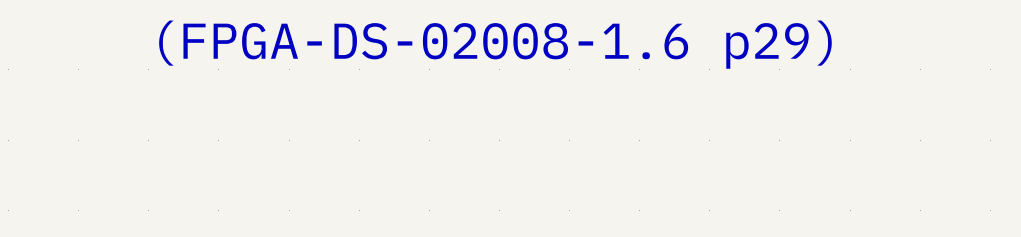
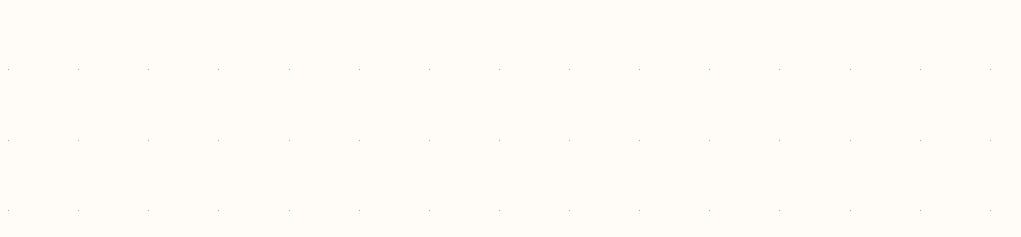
text: (FPGA-DS-02008-1.6 p29) (495, 44) -> none

